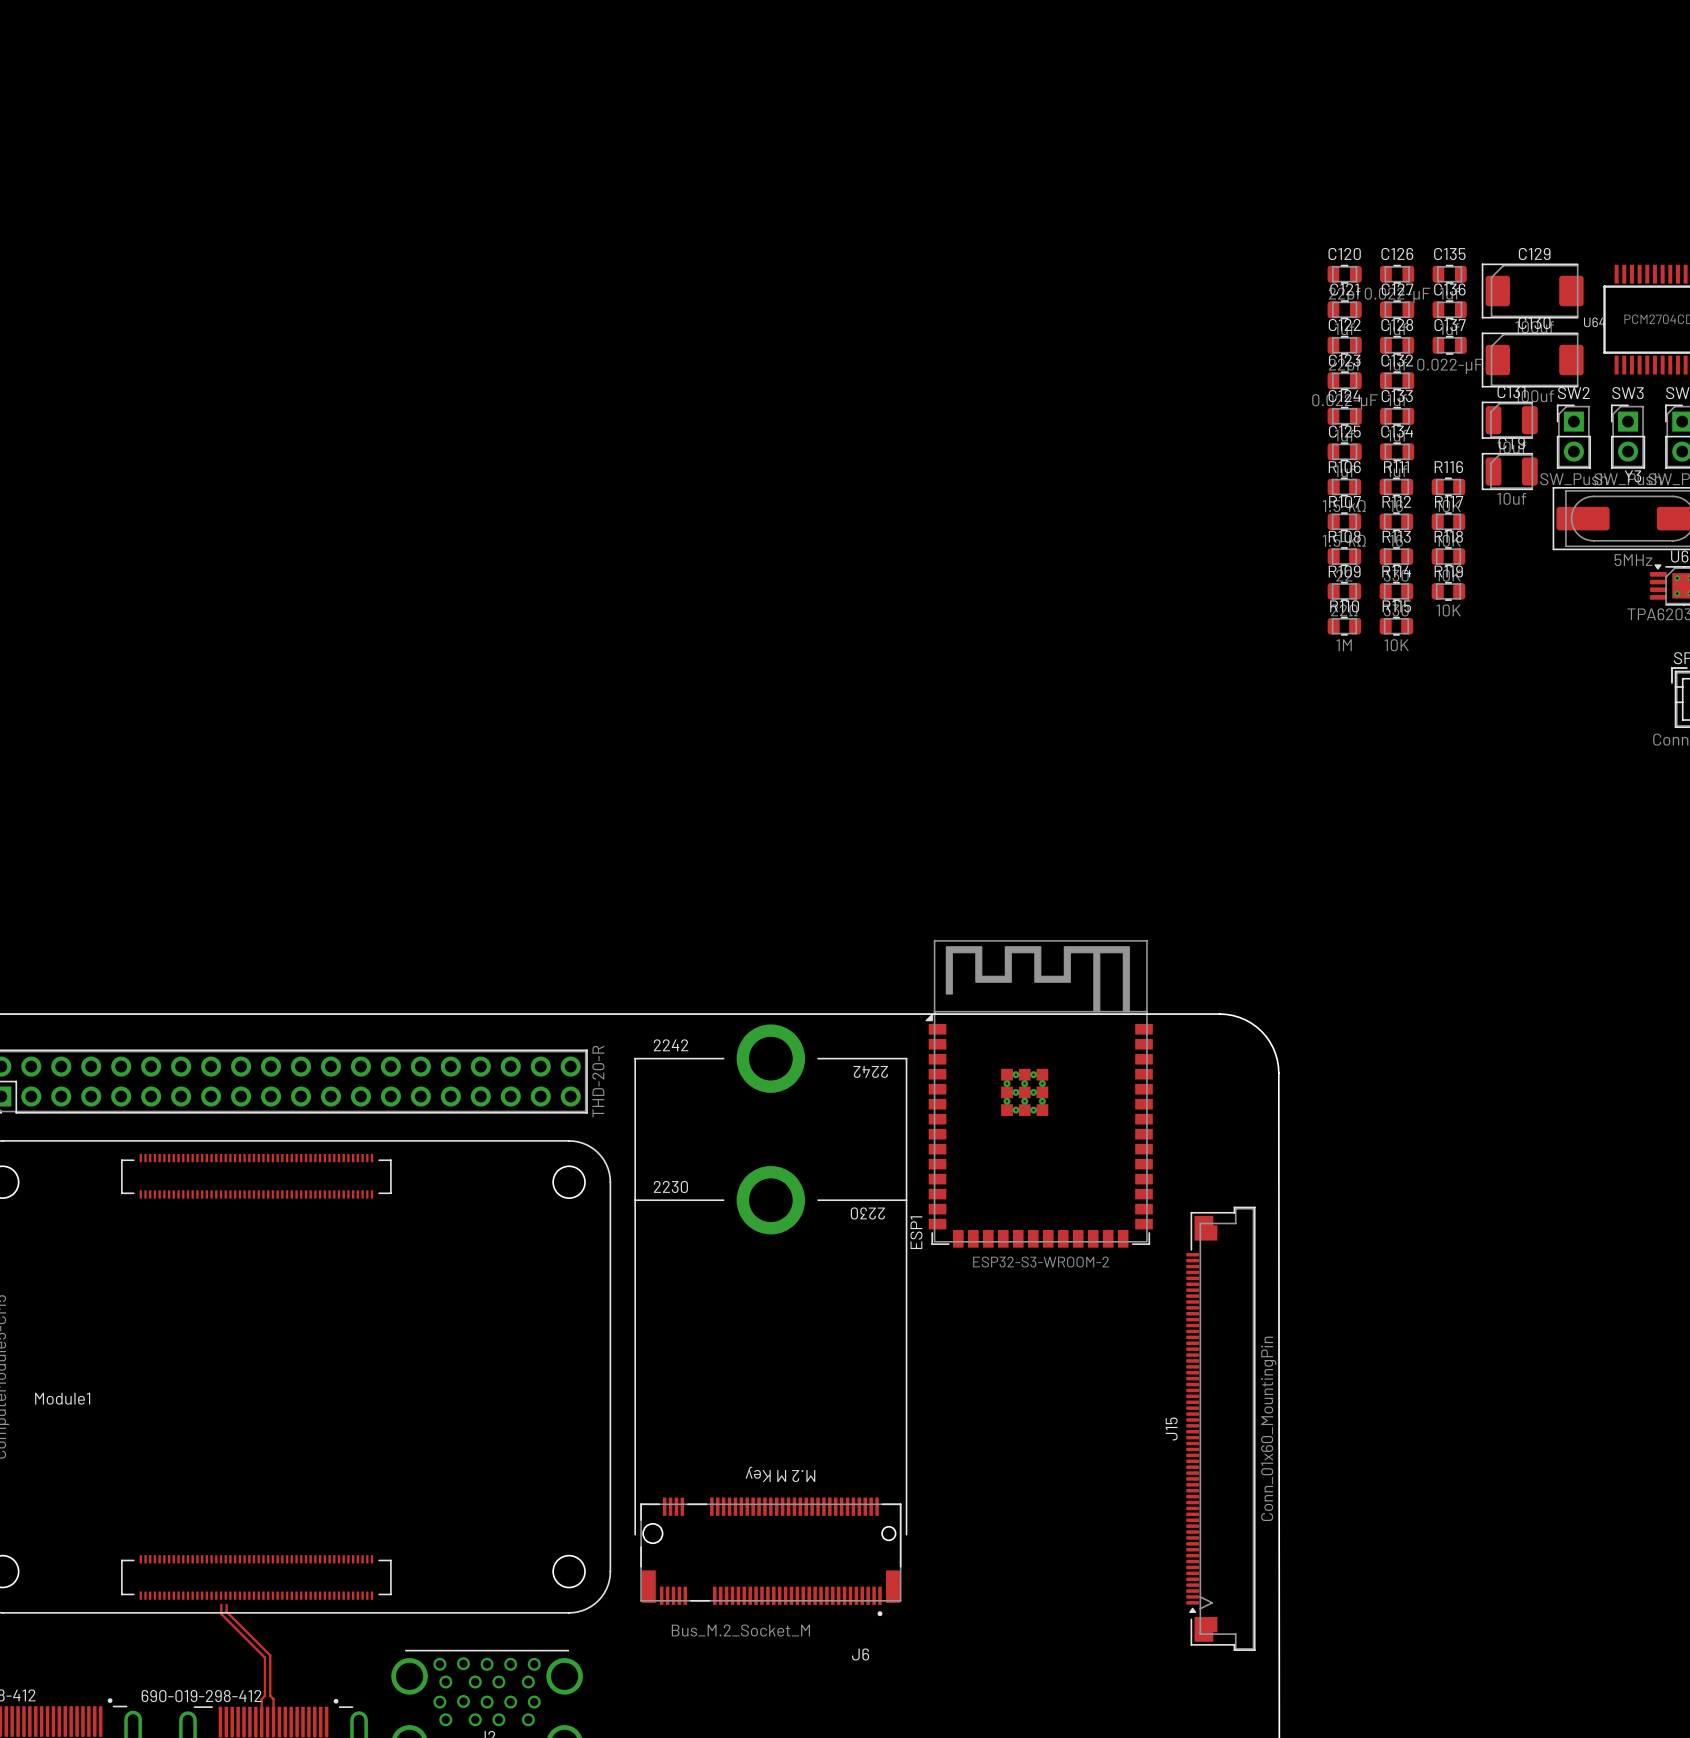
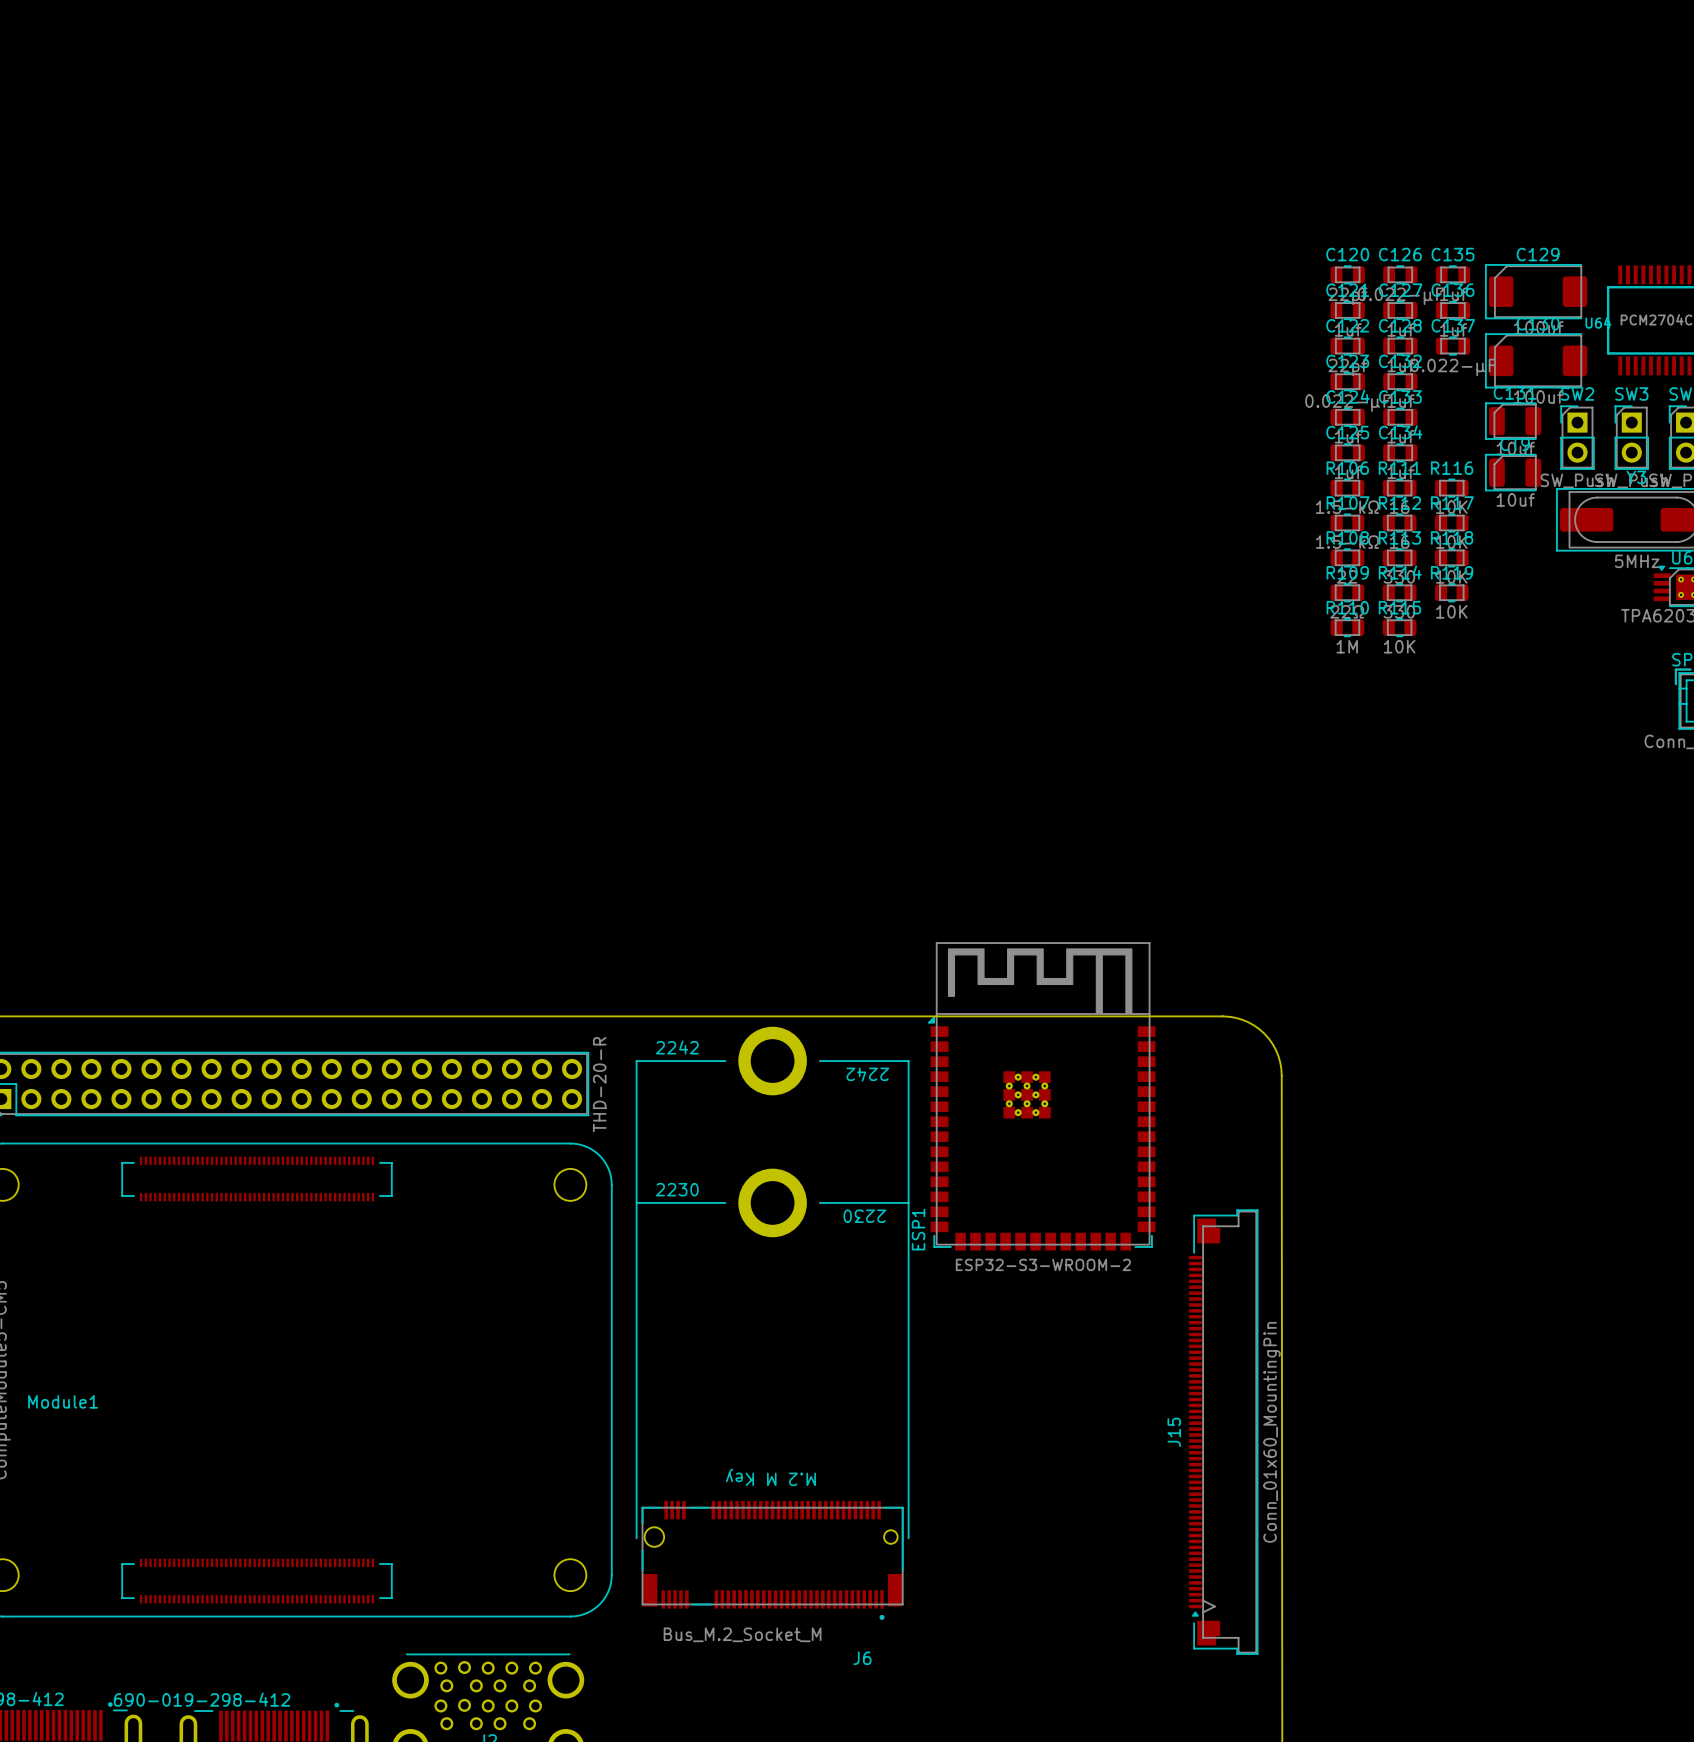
top track: (221, 1604) (221, 1613) (264, 1657) (264, 1695) (261, 1699) (261, 1722) -> none
top track: (226, 1604) (226, 1611) (270, 1655) (270, 1695) (273, 1699) (273, 1722) -> none

